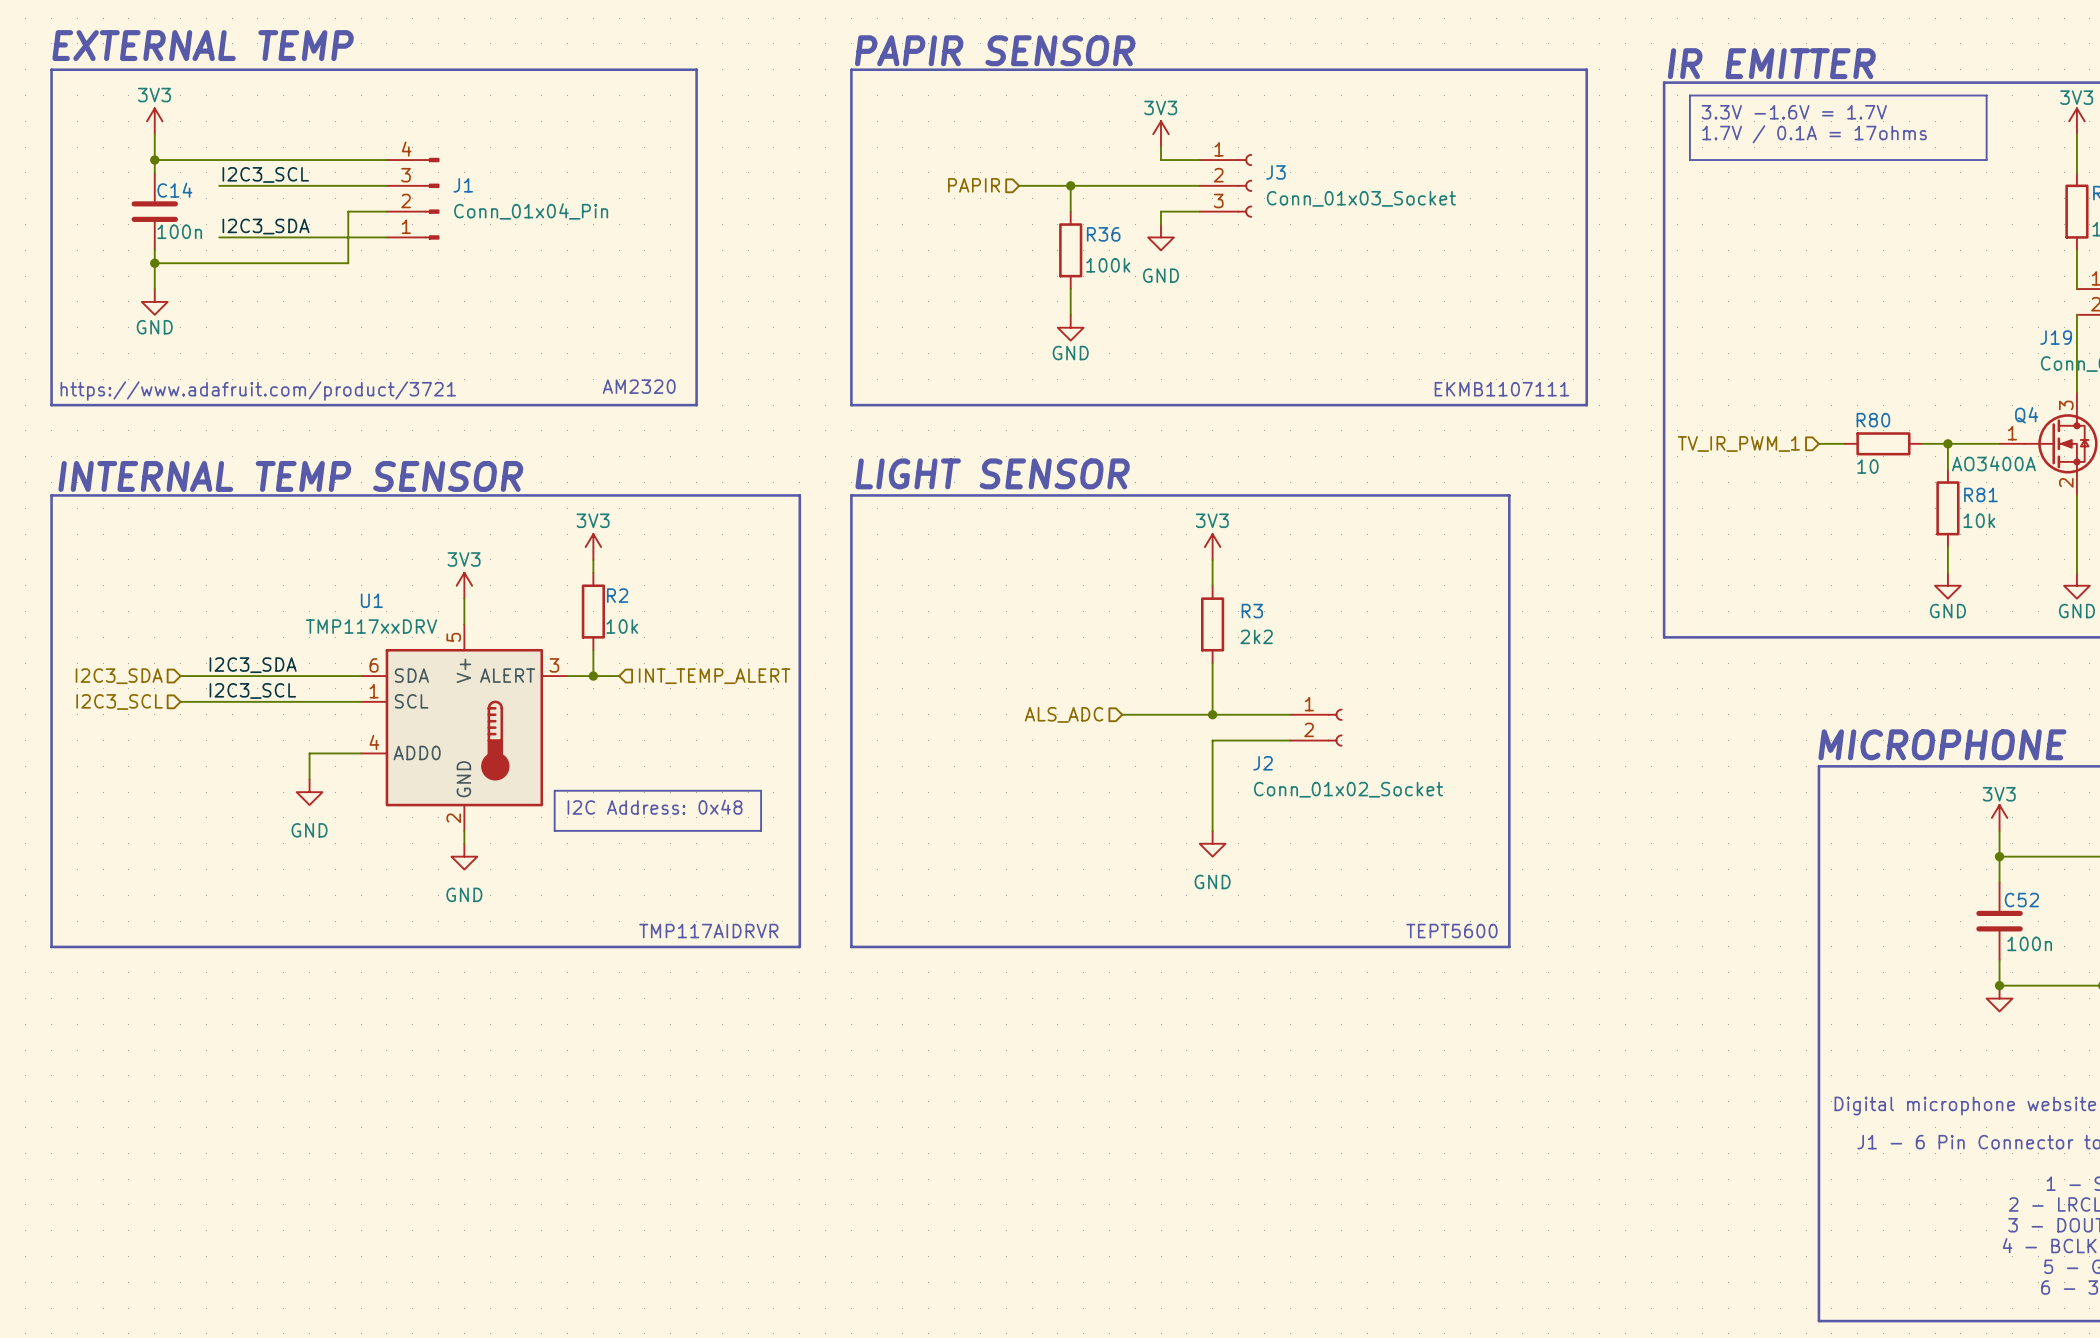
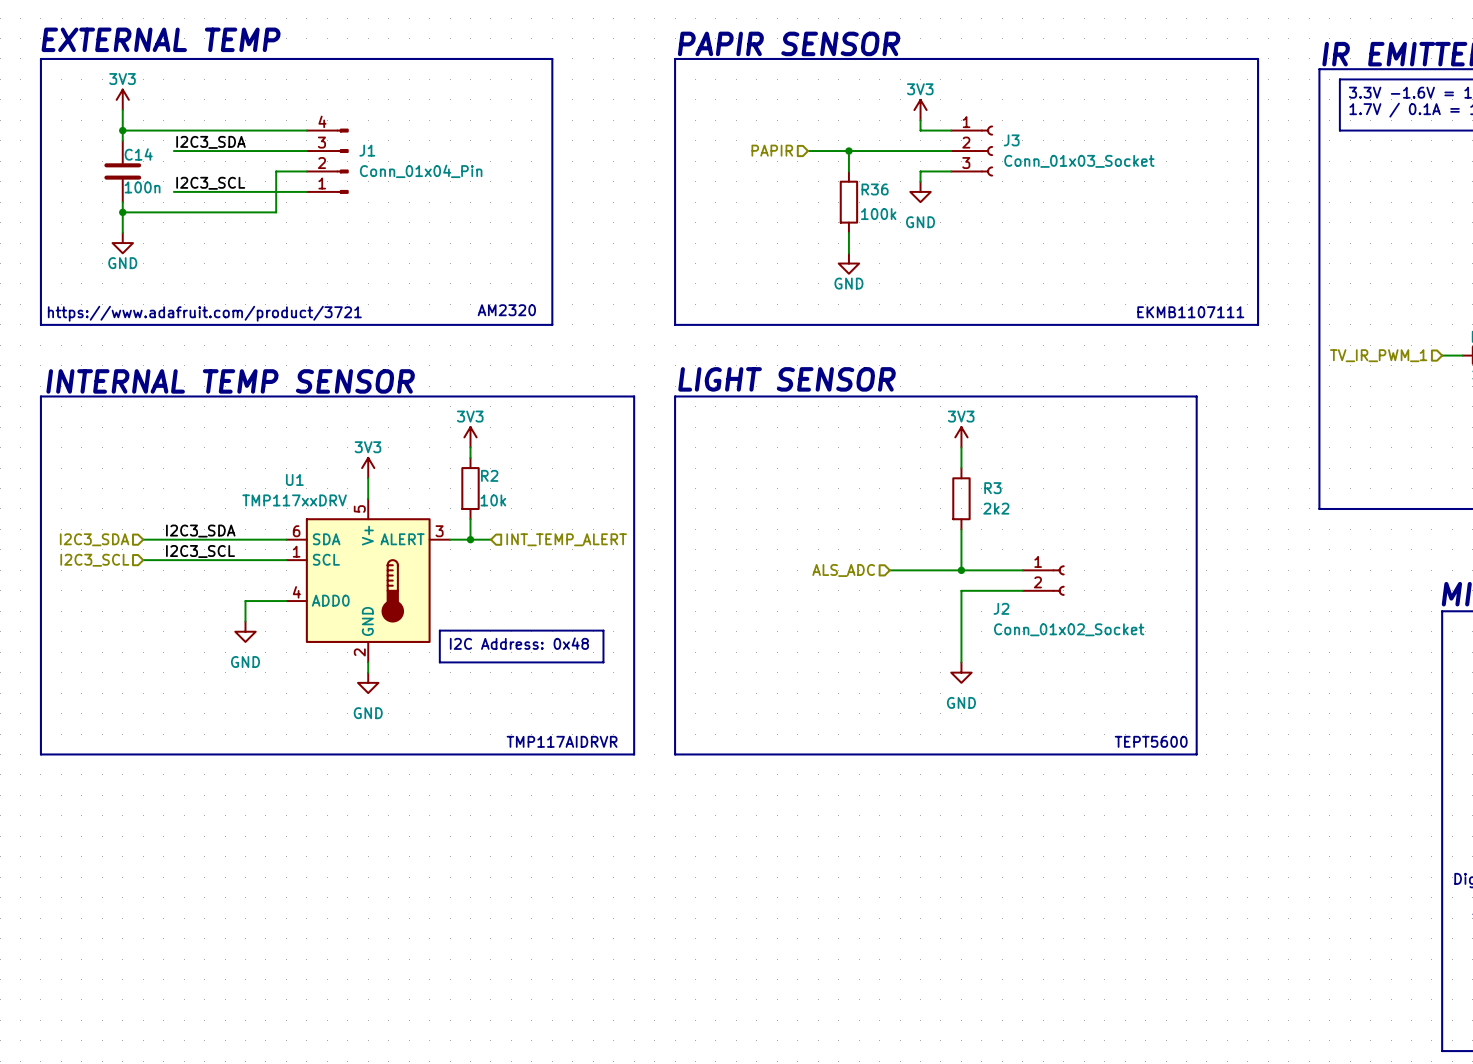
label: I2C3_SCL (265, 174) -> I2C3_SDA (210, 142)
label: I2C3_SDA (266, 226) -> I2C3_SCL (210, 183)

